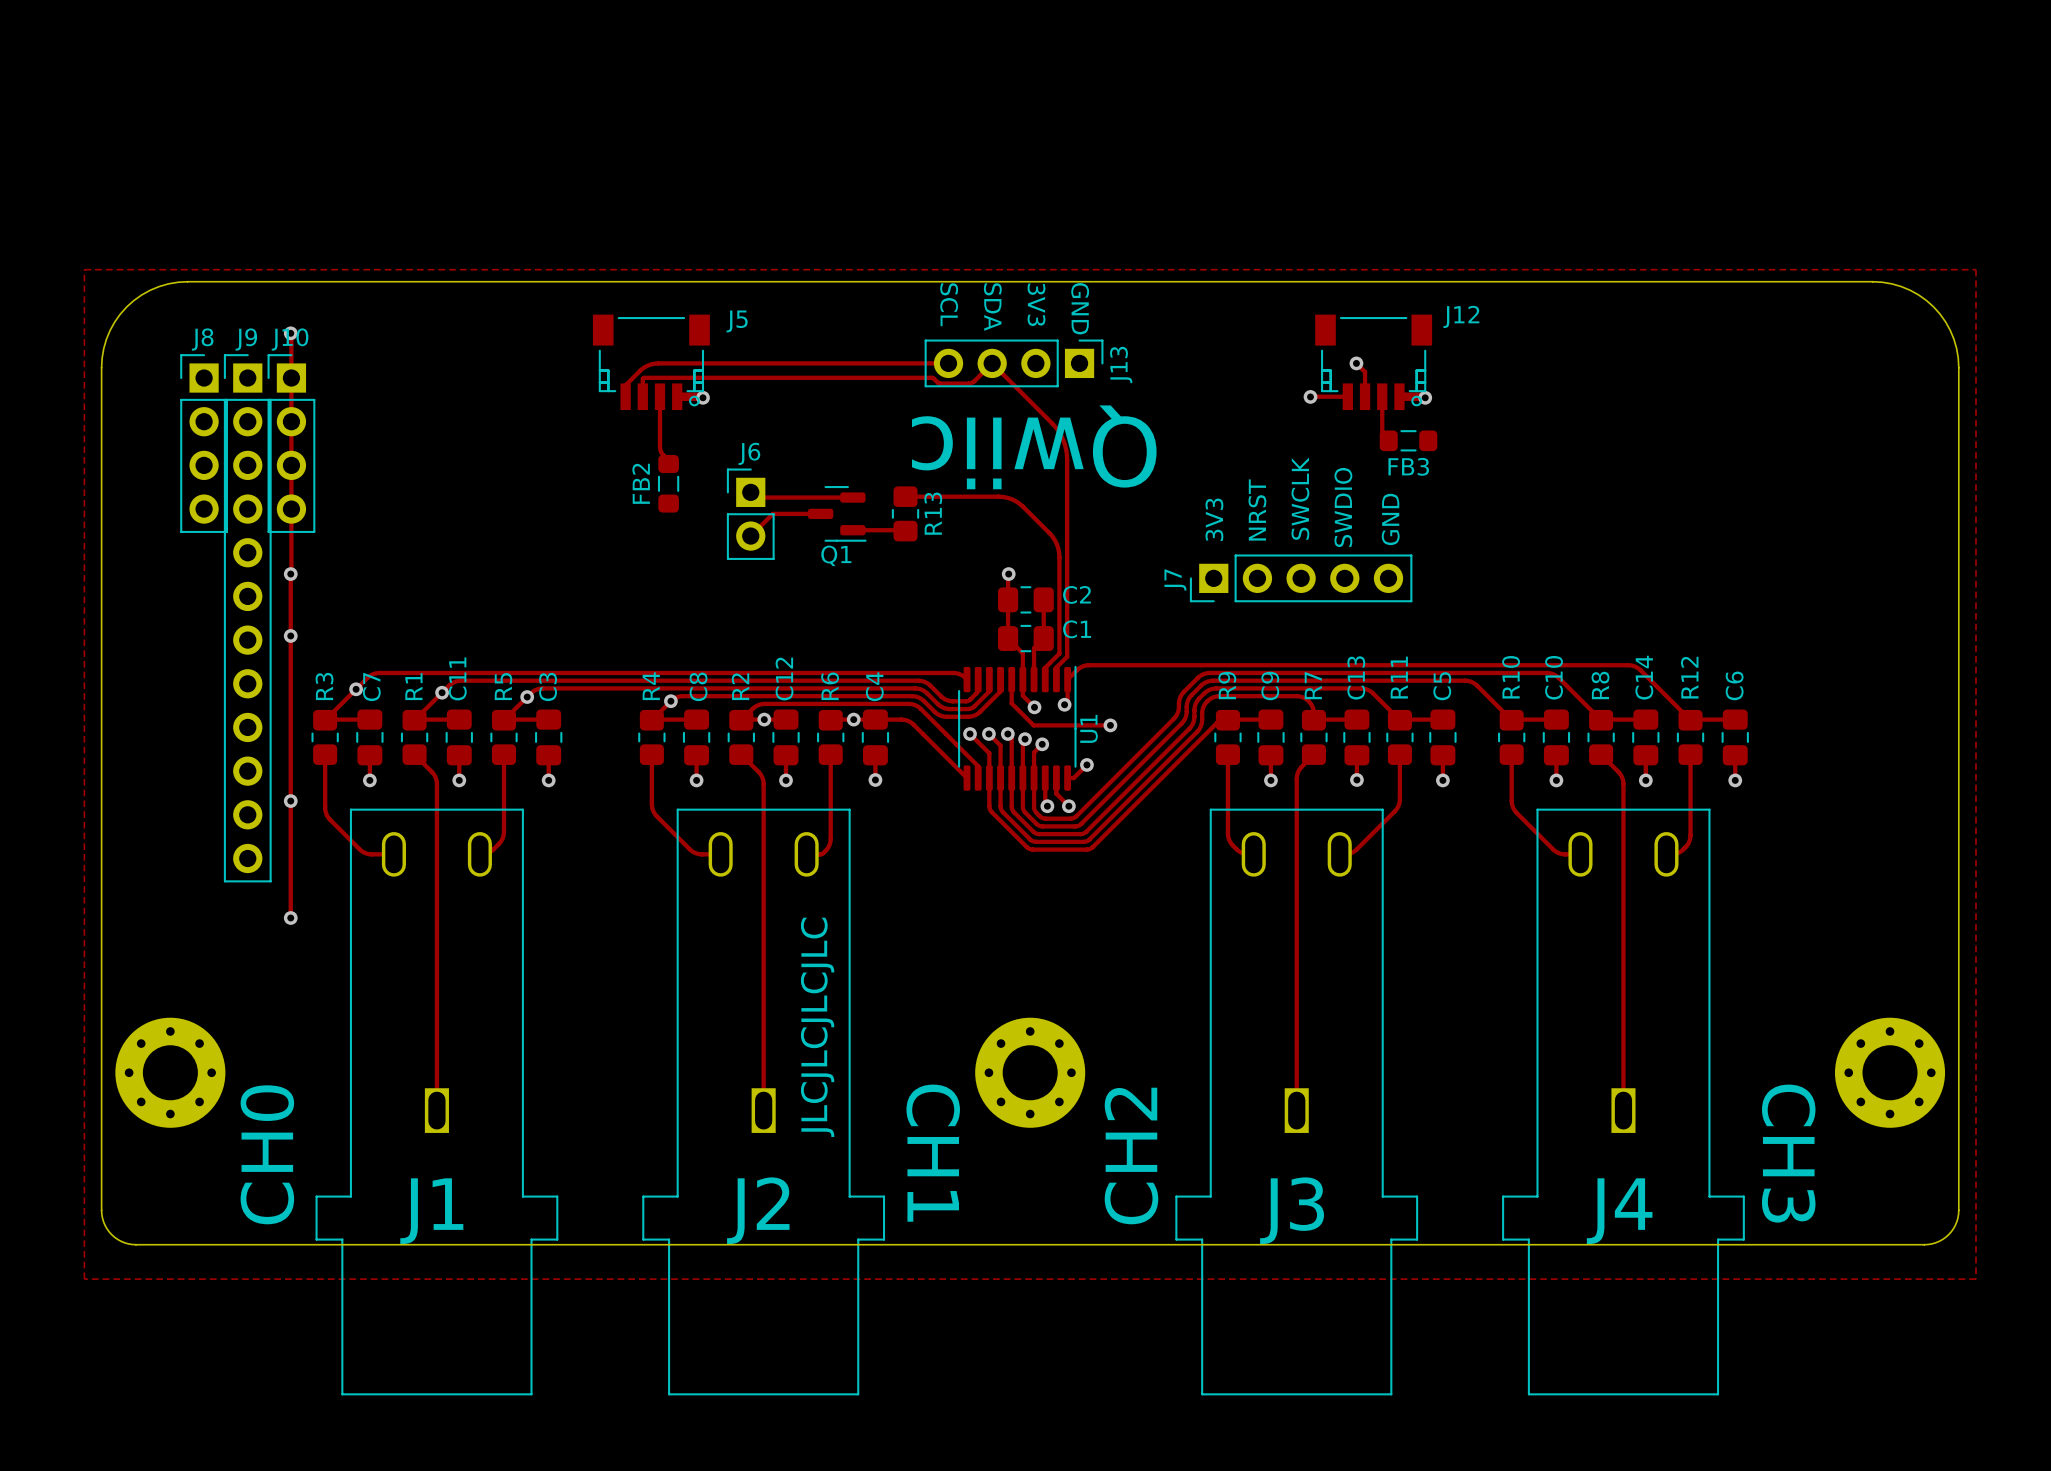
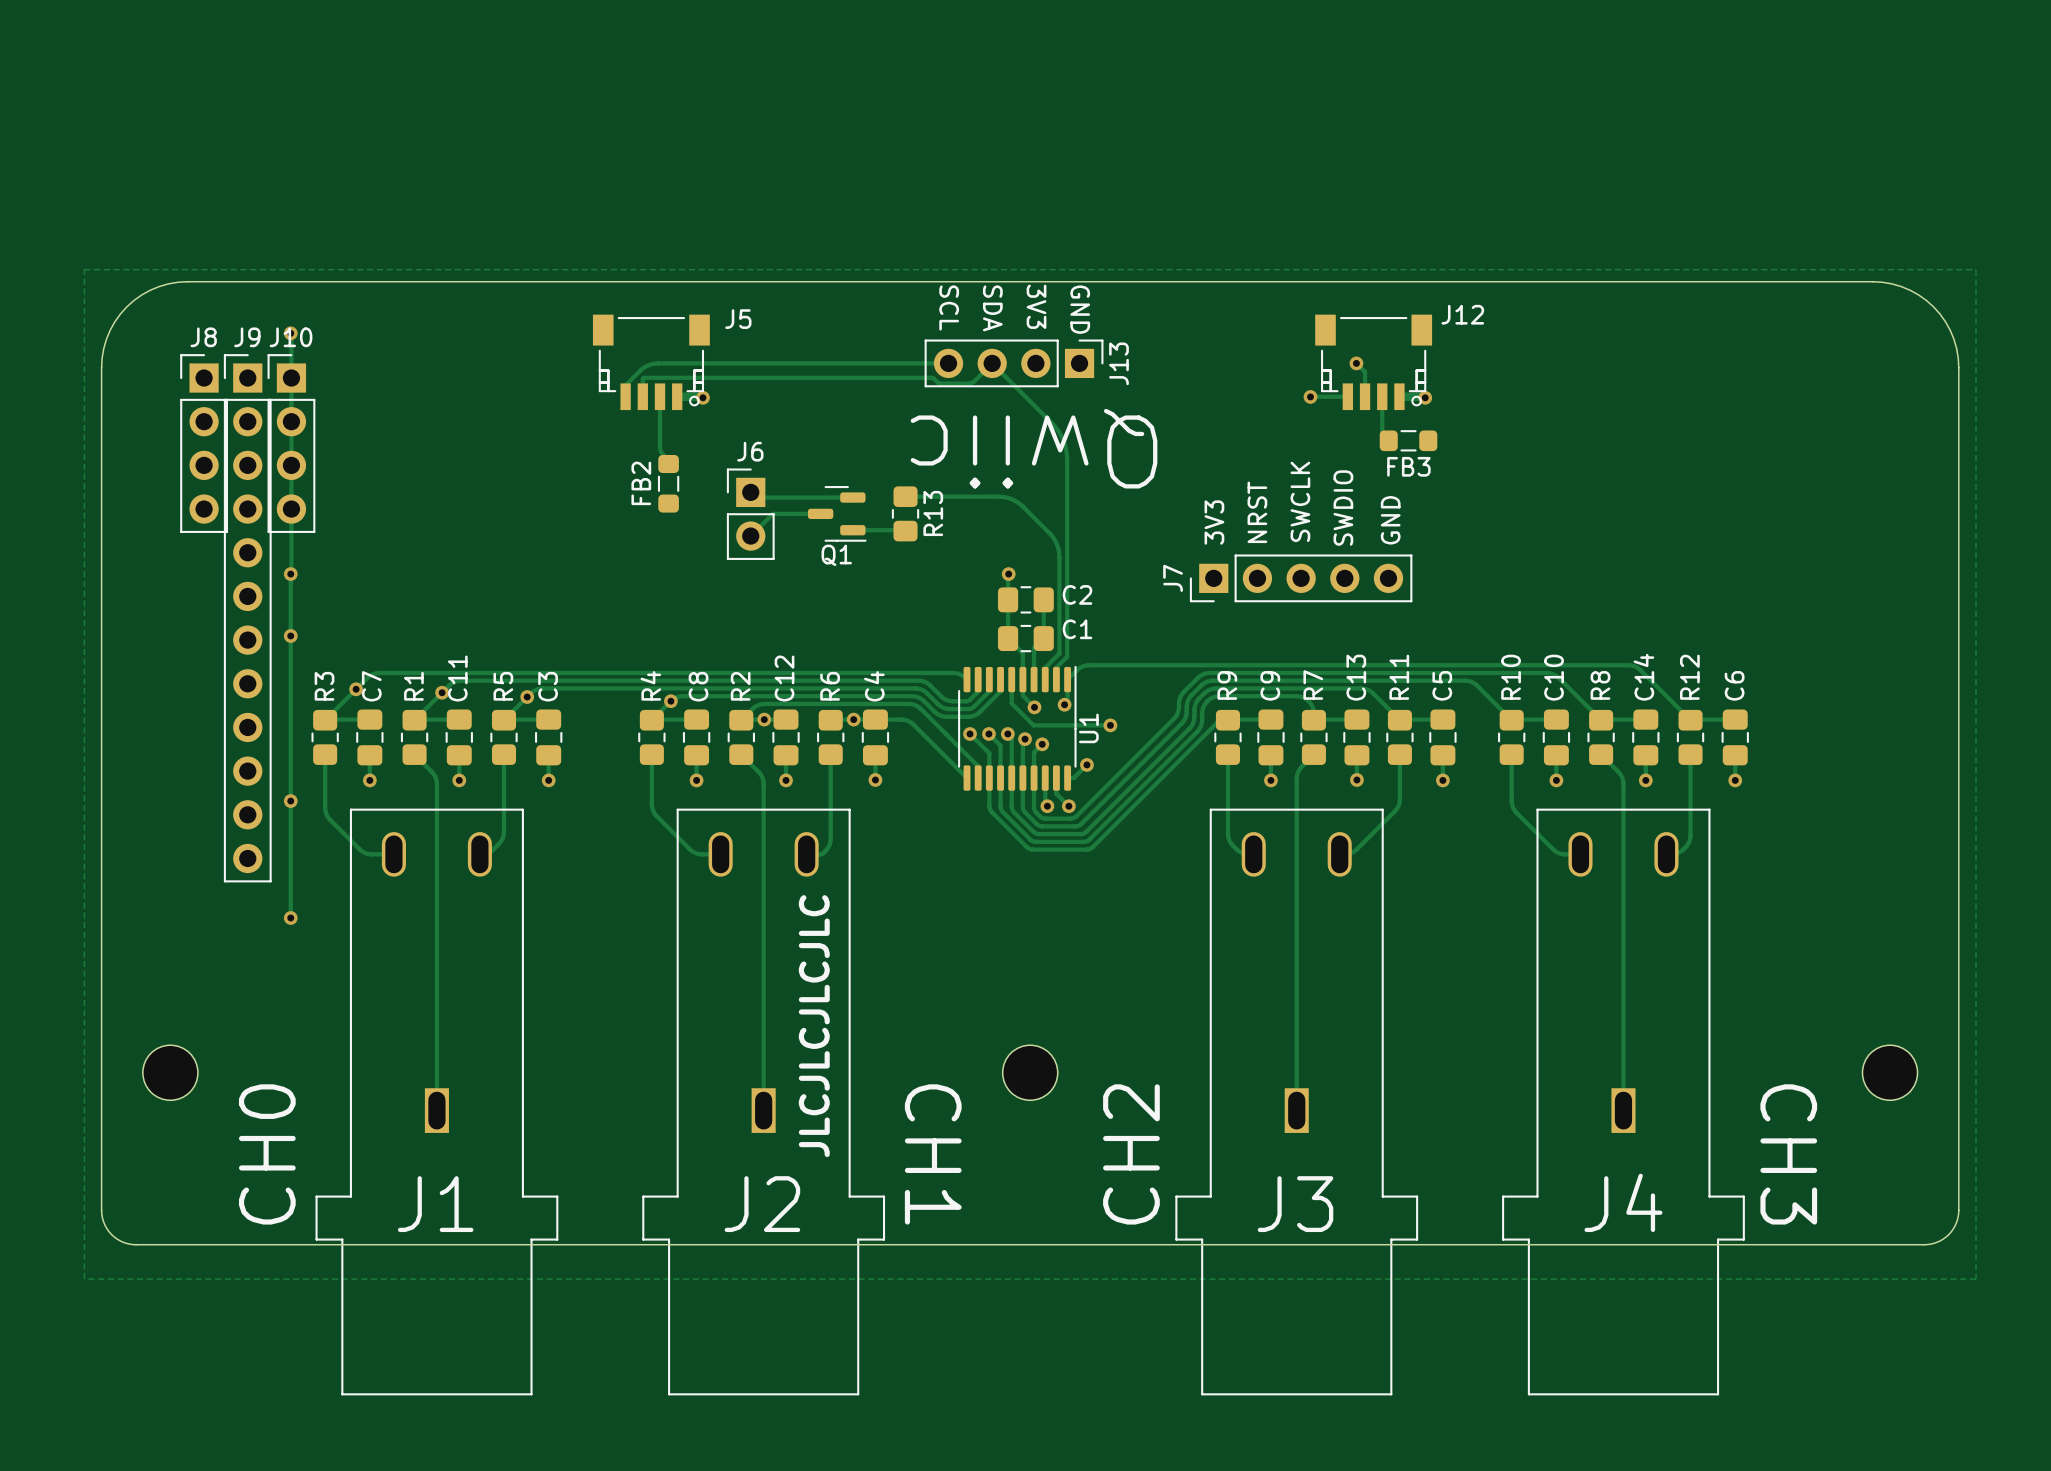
part footprint: [115, 1017, 226, 1128] -> [142, 1045, 198, 1101]
part footprint: [975, 1017, 1086, 1128] -> [1002, 1045, 1058, 1101]
part footprint: [1834, 1017, 1946, 1128] -> [1862, 1045, 1918, 1101]

